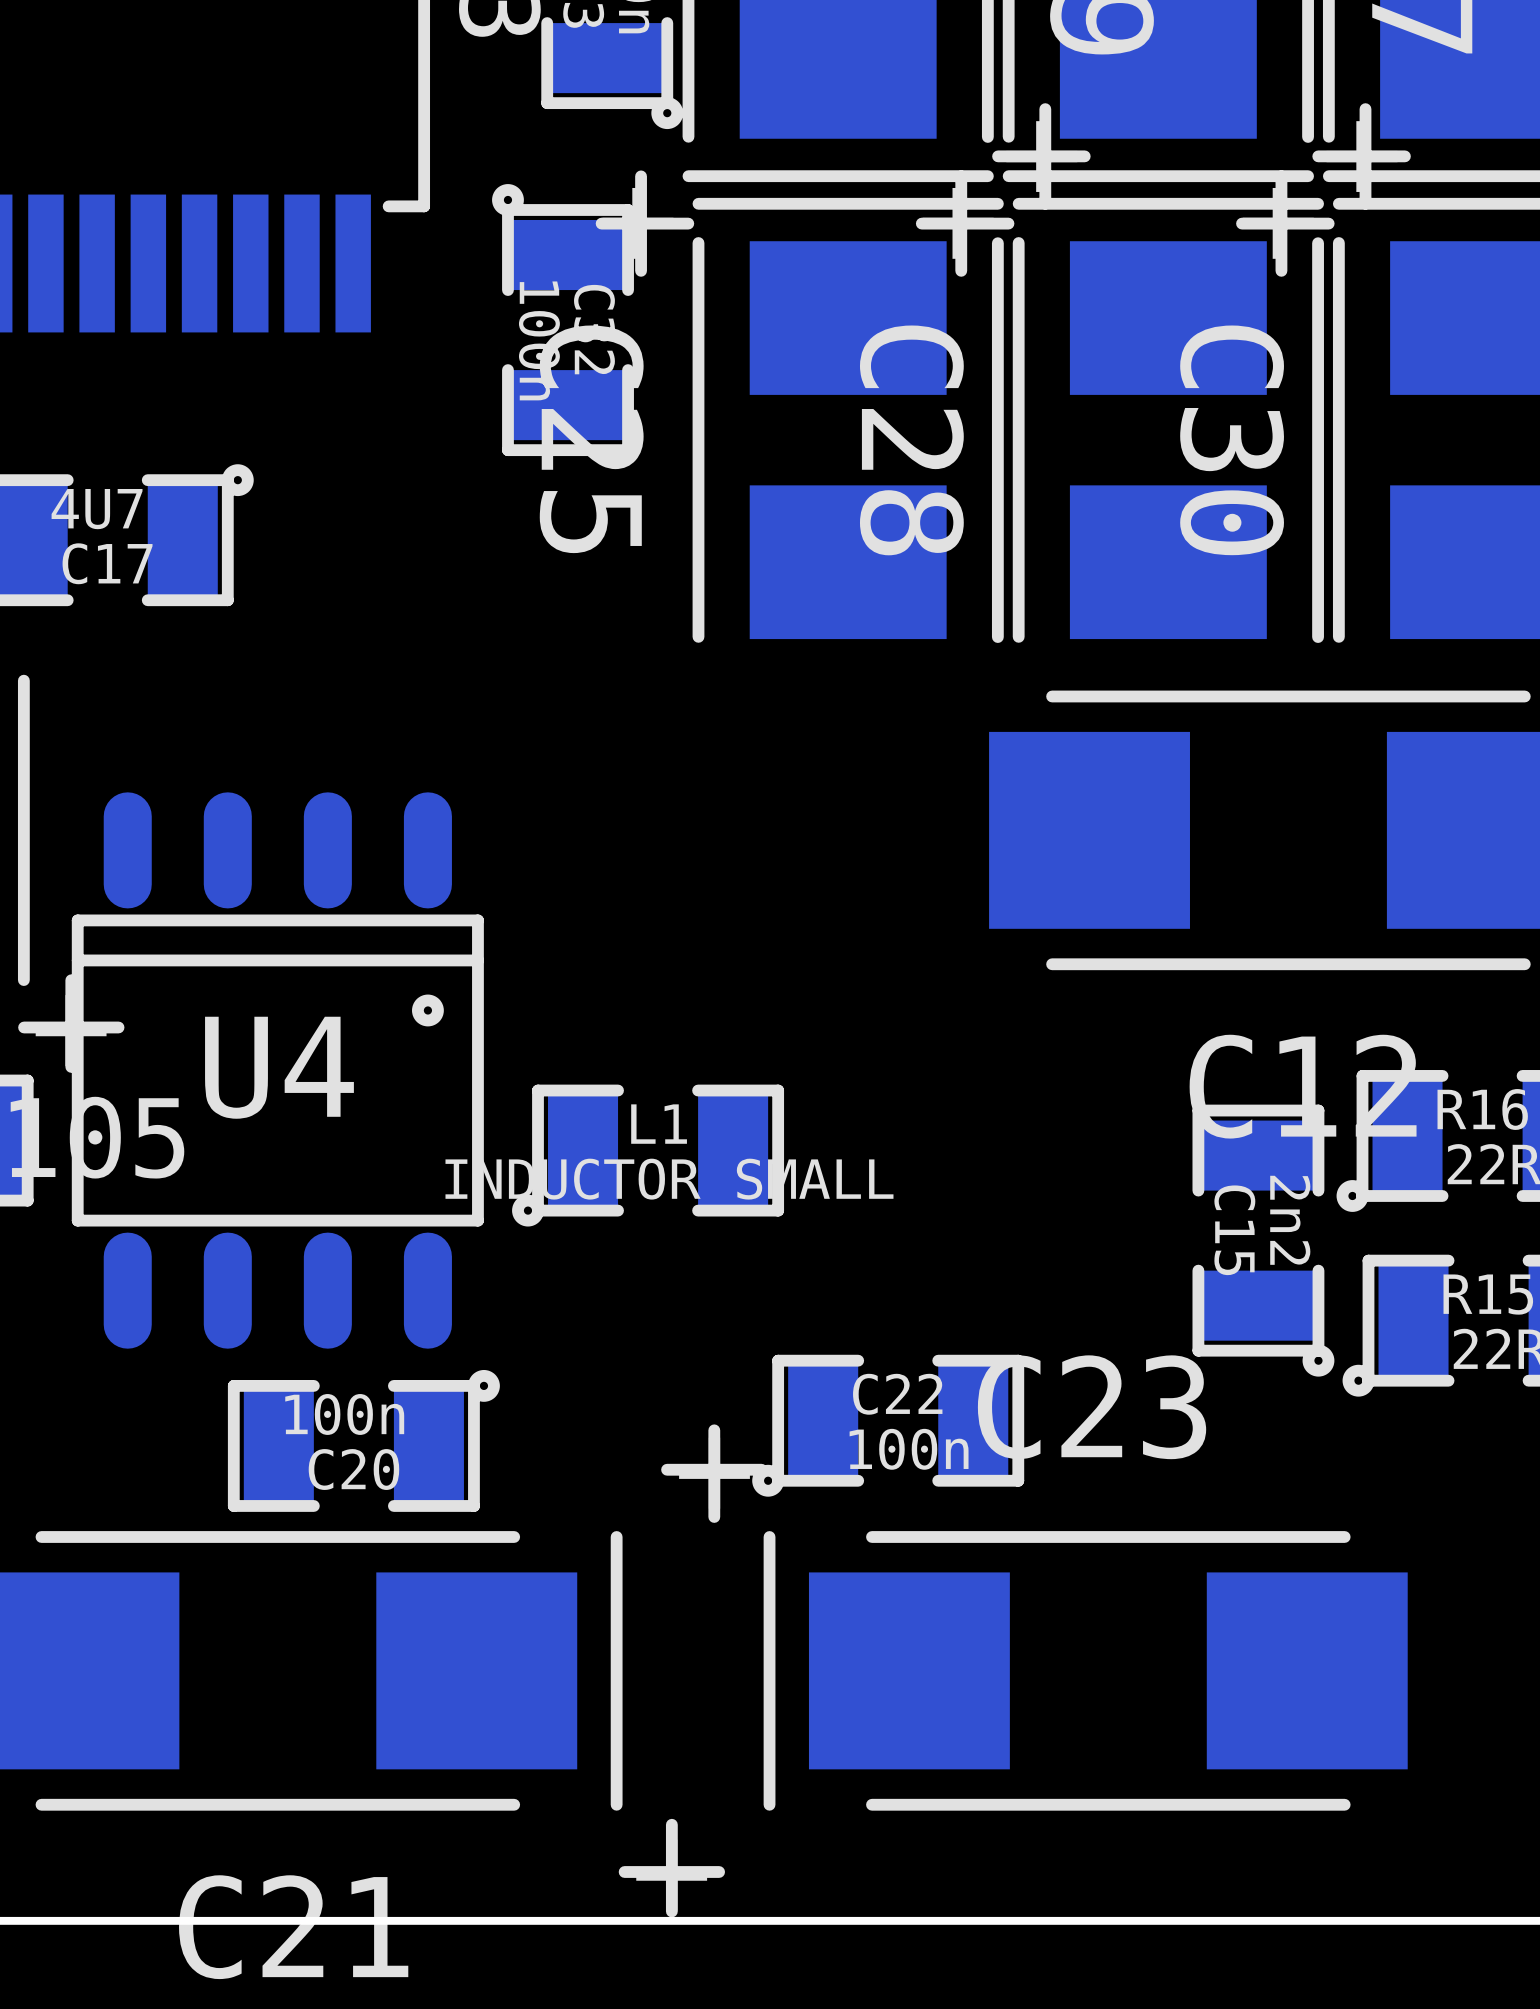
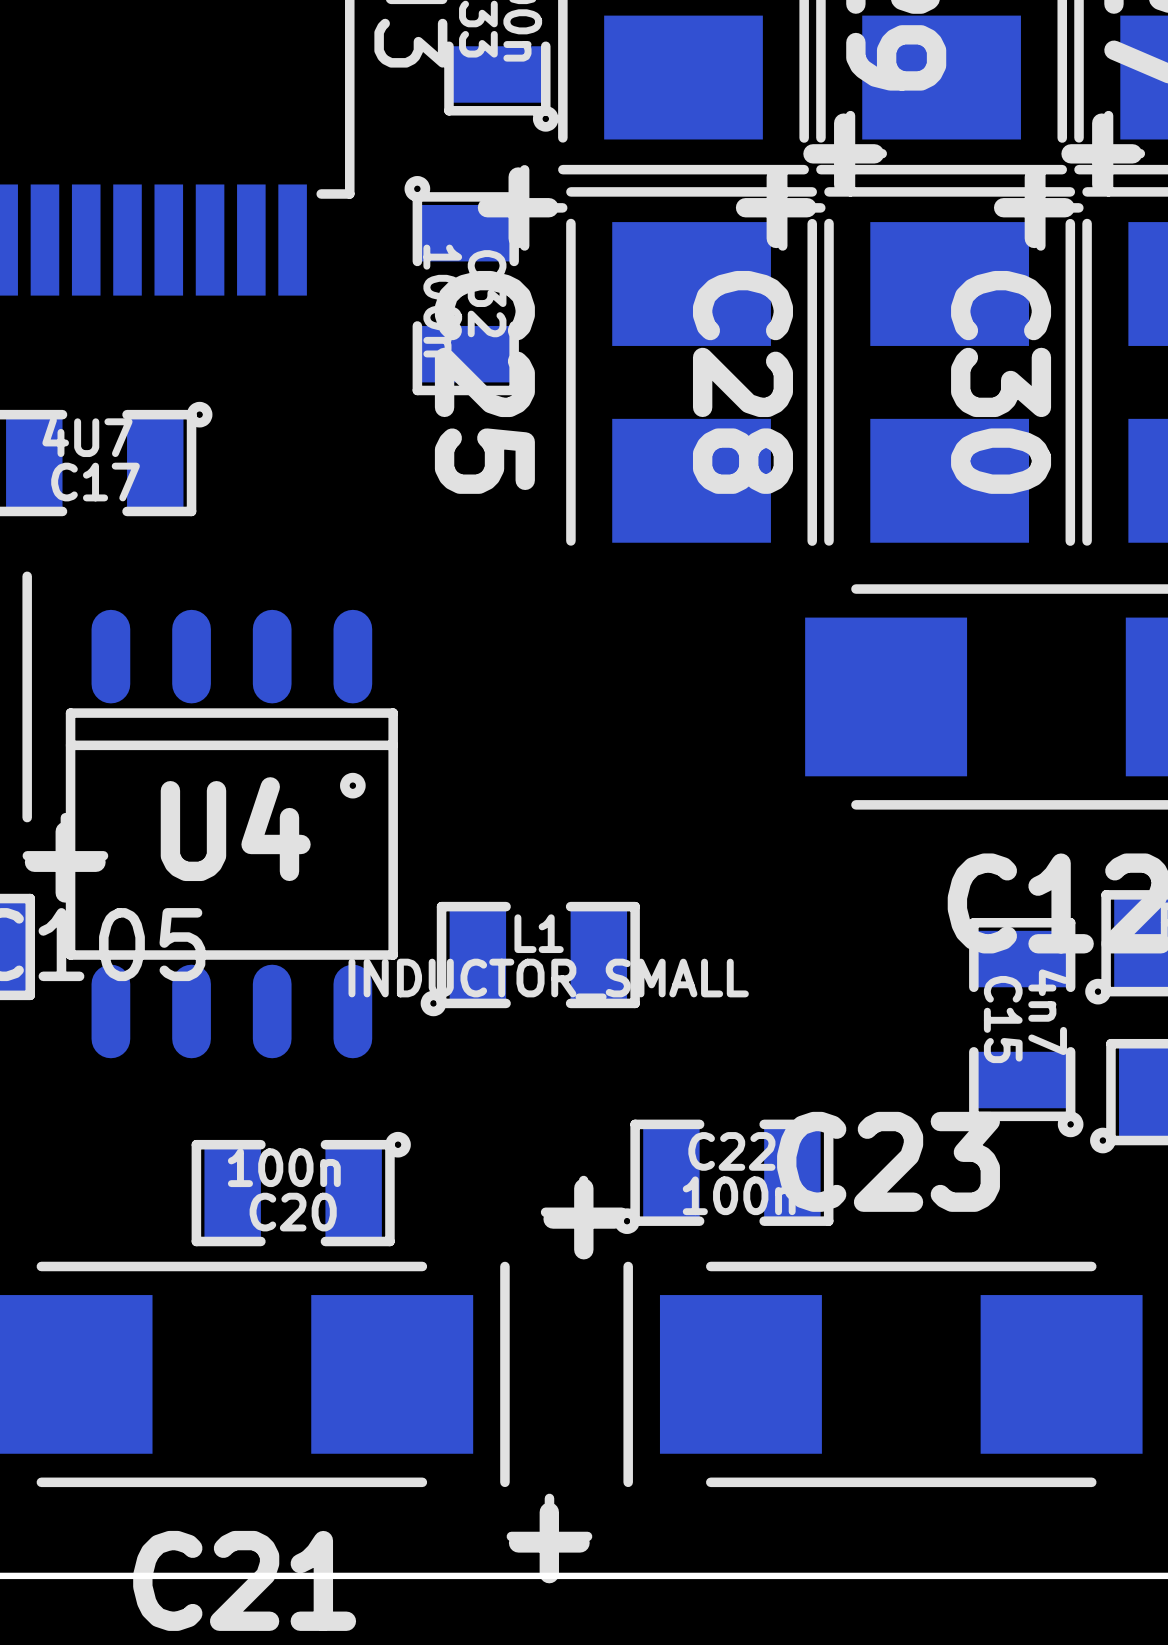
U4 position: (277, 1070) -> (231, 834)
C15 value: 2n2 (1290, 1220) -> 4n7 (1048, 1012)

